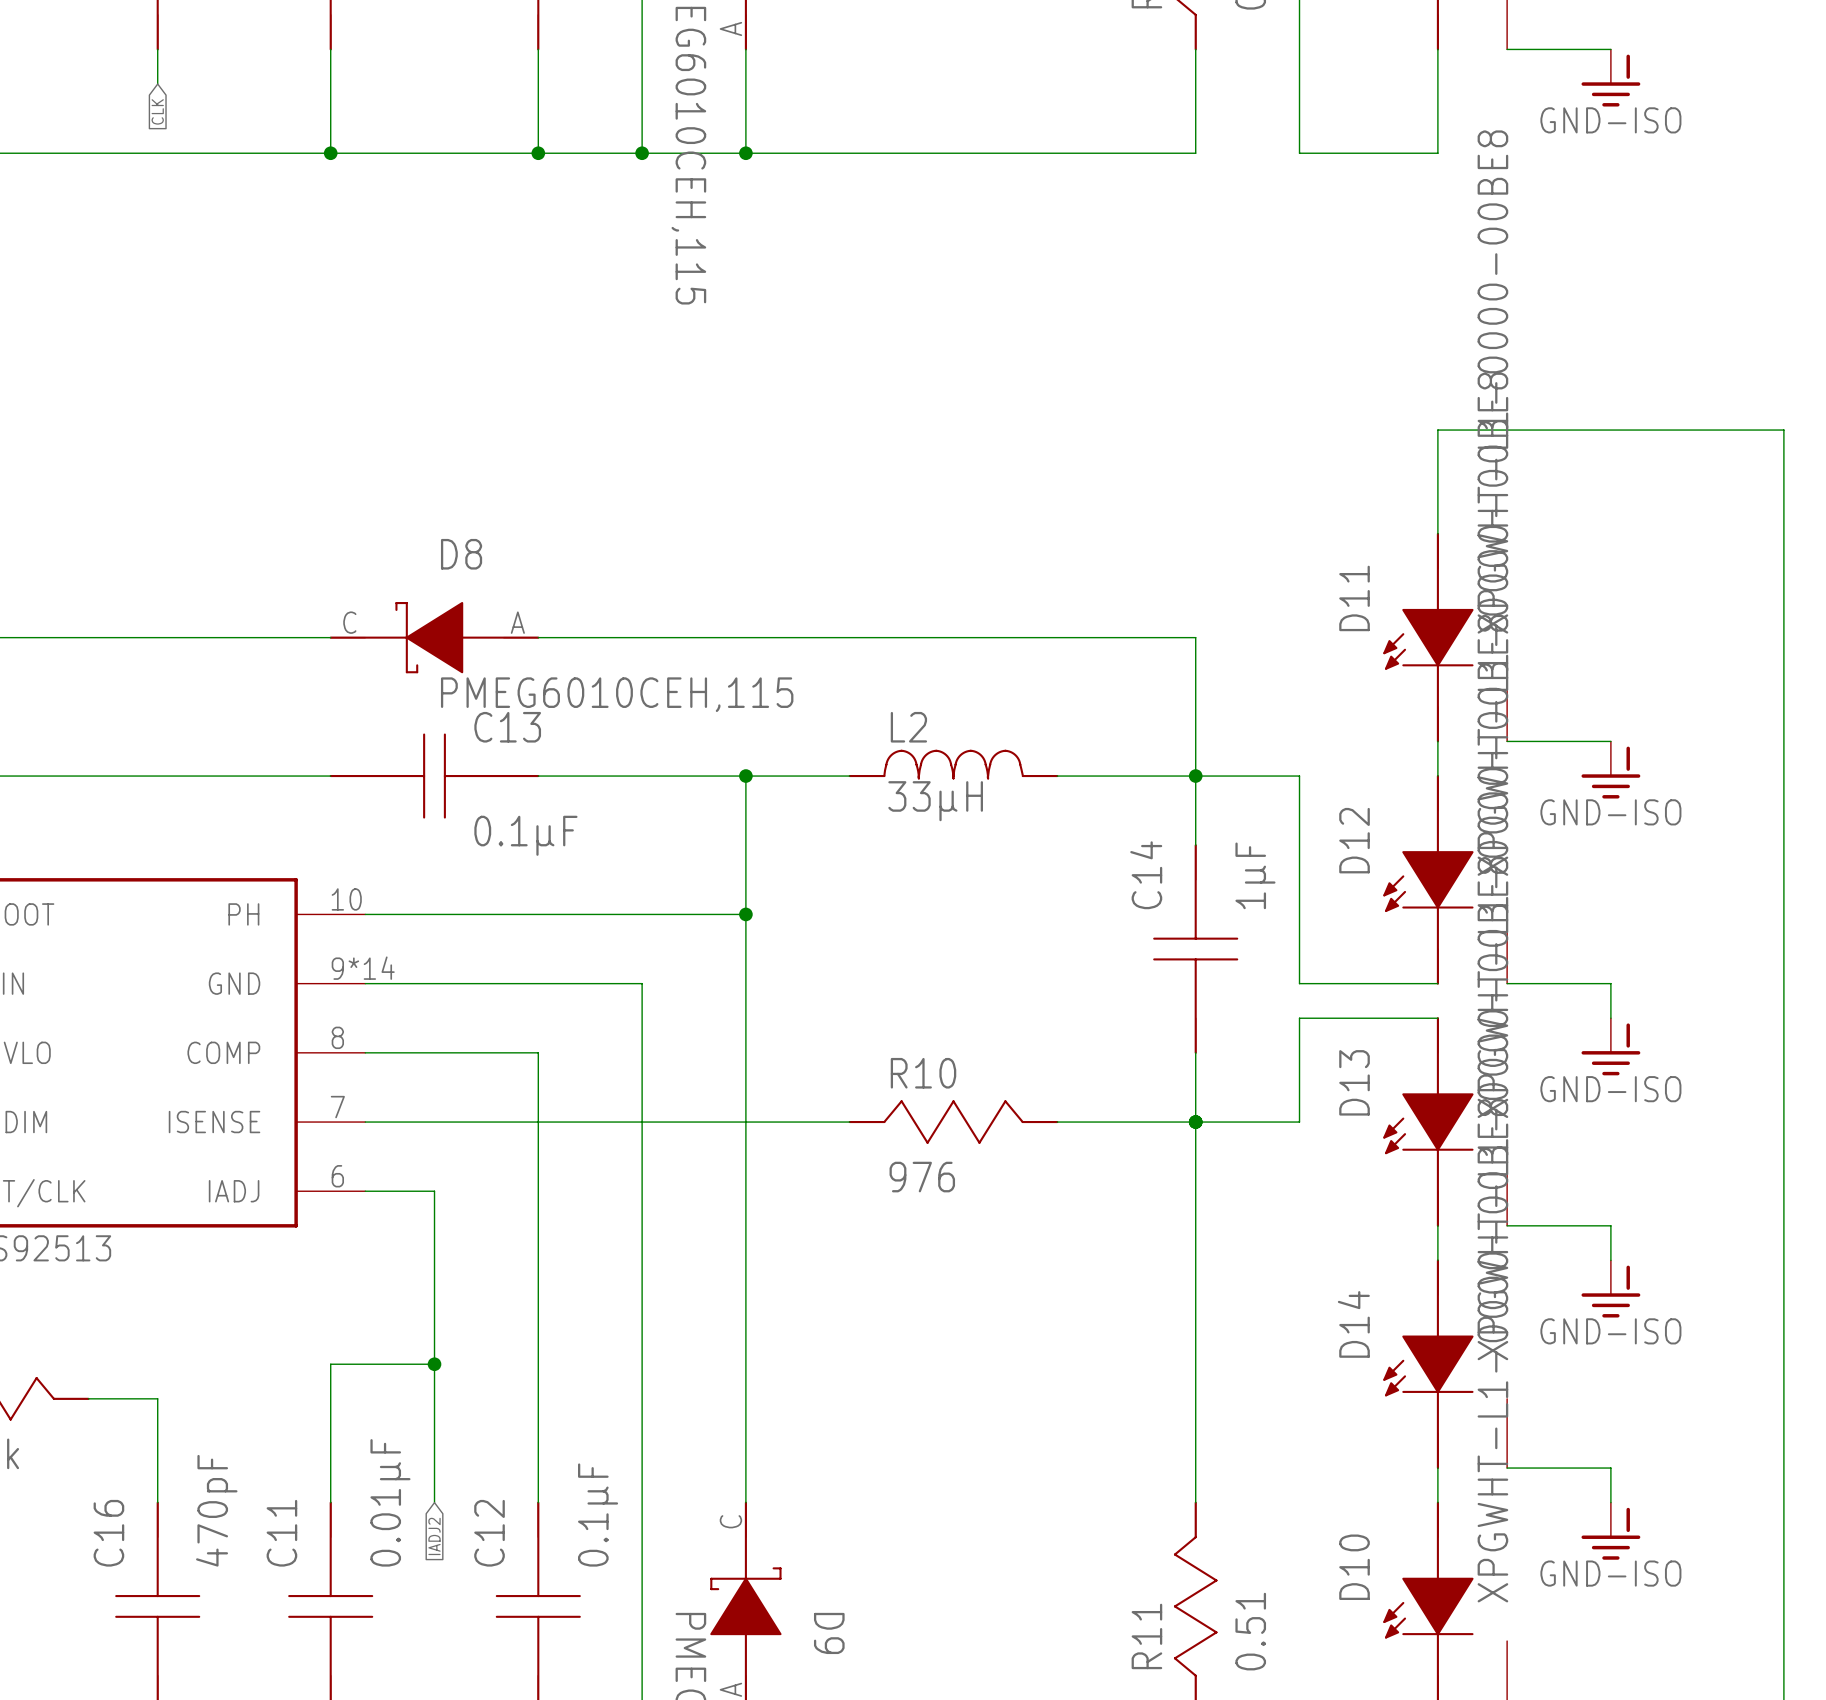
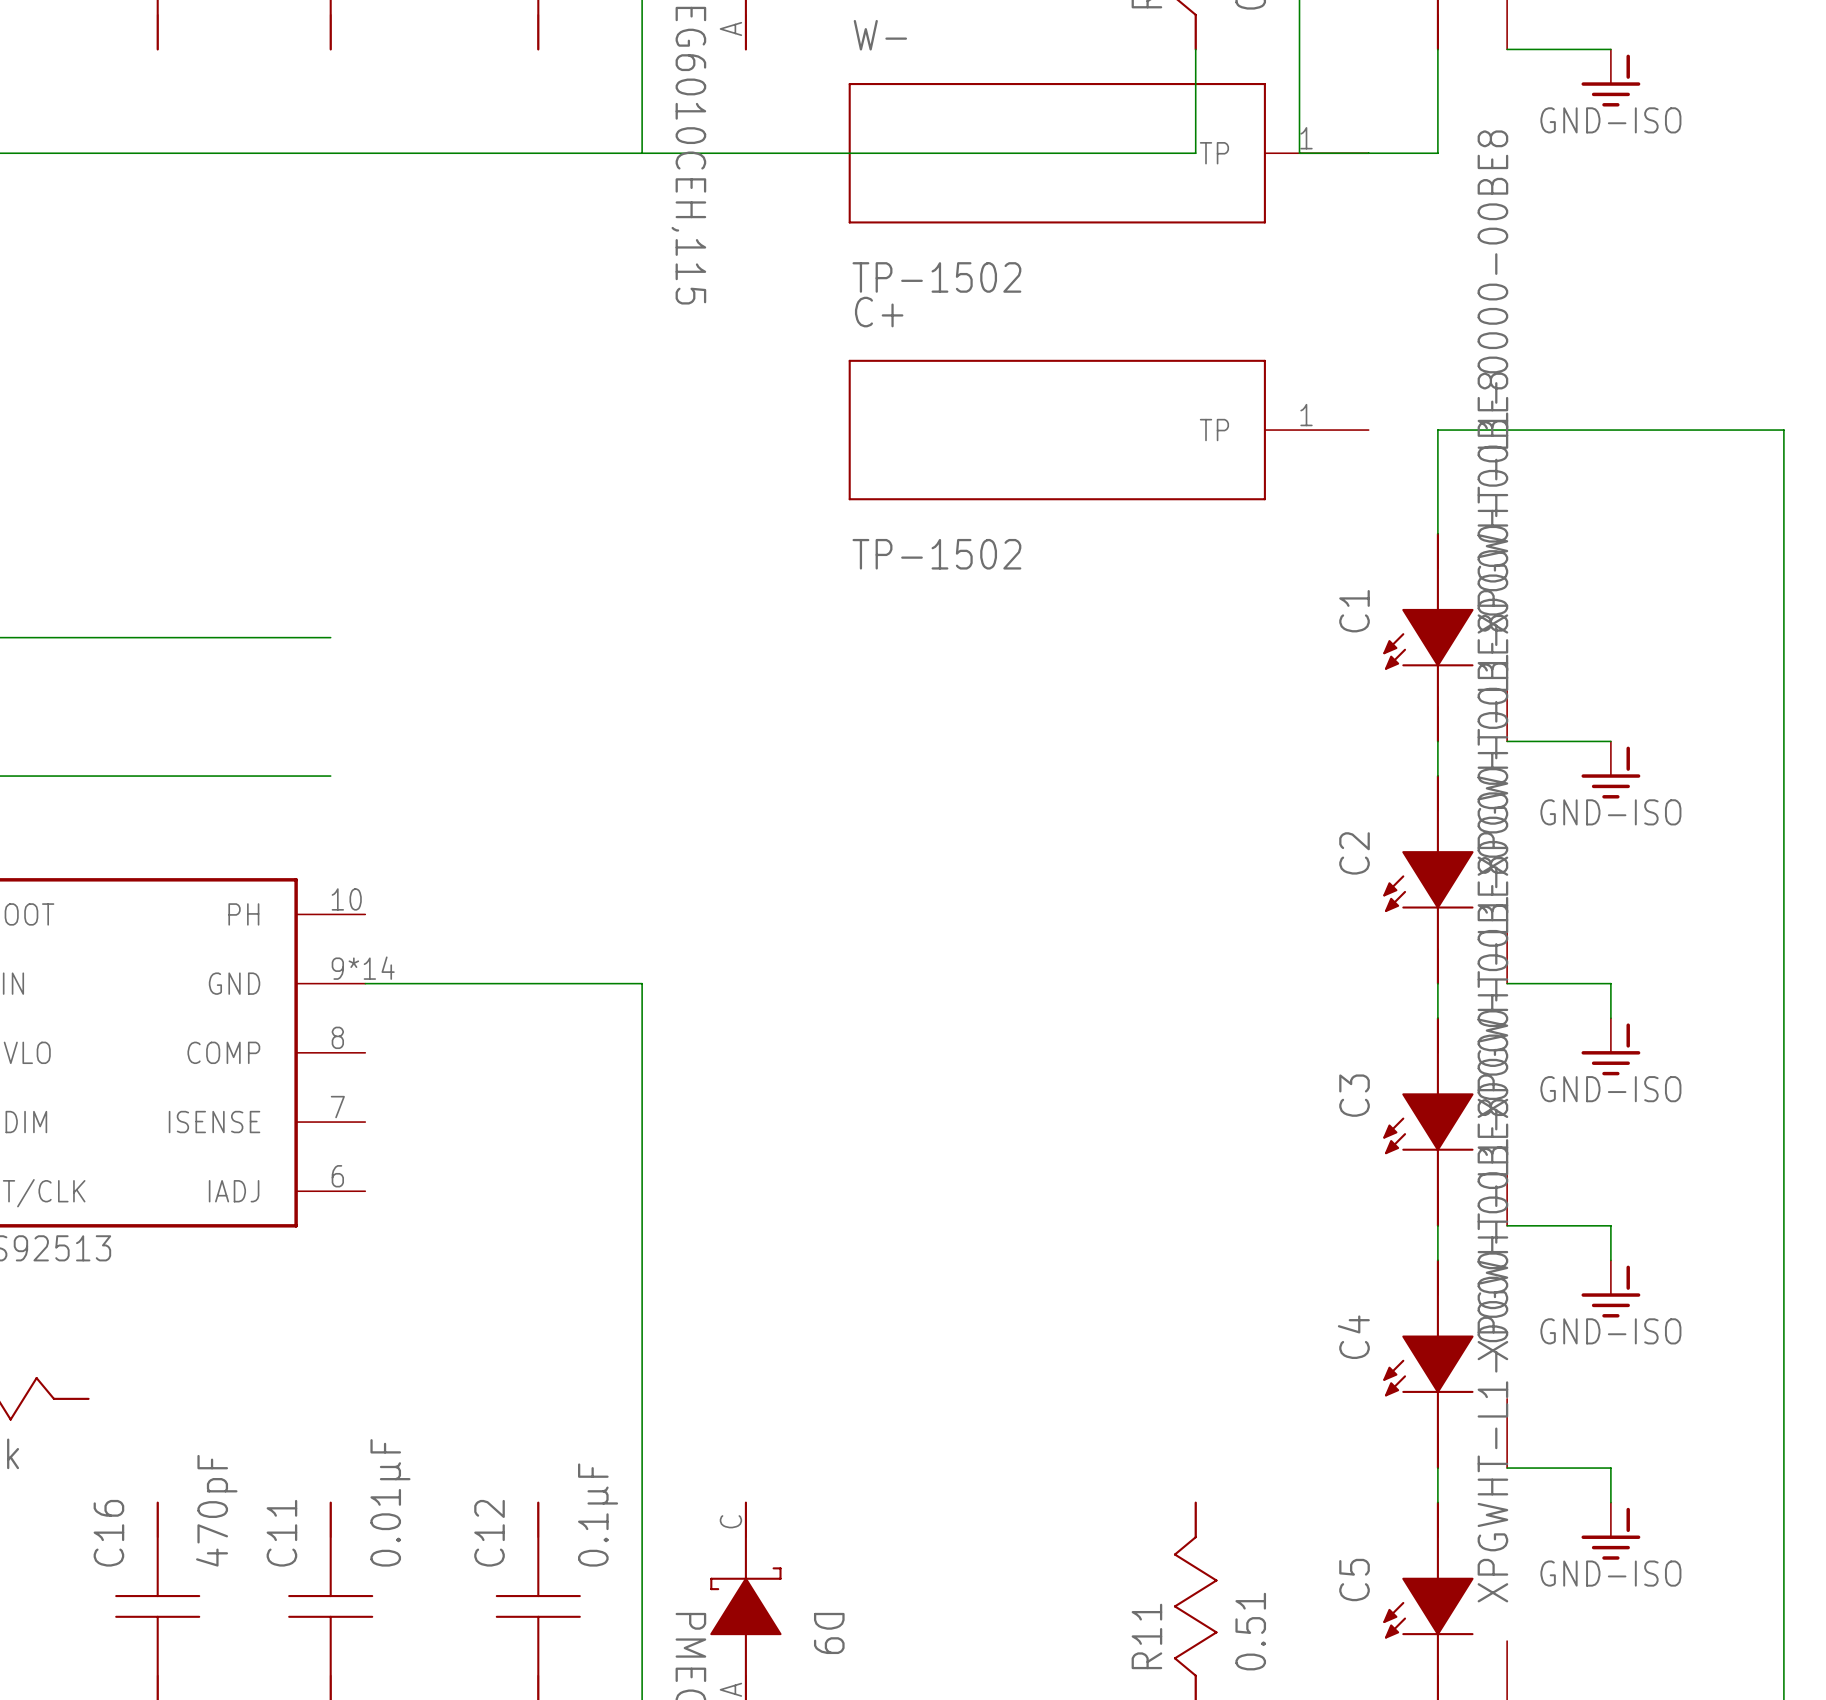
wire: (157, 49) (157, 84) -> none
wire: (330, 49) (330, 153) -> none
wire: (538, 49) (538, 153) -> none
wire: (745, 49) (745, 153) -> none
global label: CLK (157, 111) -> none
junction: (330, 153) -> none
junction: (538, 153) -> none
junction: (642, 153) -> none
junction: (745, 153) -> none
W-: none -> TP-1502 (1108, 153)
C+: none -> TP-1502 (1108, 430)
D11 name: D11 (1354, 598) -> C1 (1354, 611)
D8: PMEG6010CEH,115 (434, 637) -> none
wire: (538, 637) (1195, 637) (1195, 845) -> none
L2: 33µH (953, 764) -> none
C13: 0.1µF (434, 776) -> none
wire: (538, 776) (849, 776) -> none
wire: (745, 776) (745, 1502) -> none
junction: (745, 776) -> none
wire: (1057, 776) (1299, 776) (1299, 983) (1437, 983) -> none
junction: (1195, 776) -> none
D12 name: D12 (1354, 840) -> C2 (1354, 853)
wire: (365, 914) (745, 914) -> none
junction: (745, 914) -> none
C14: 1µF (1195, 949) -> none
wire: (1437, 1018) (1299, 1018) (1299, 1122) (1057, 1122) -> (1437, 1018) (1437, 983)
wire: (365, 1052) (538, 1052) (538, 1502) -> none
wire: (1195, 1052) (1195, 1502) -> none
D13 name: D13 (1354, 1082) -> C3 (1354, 1095)
wire: (365, 1122) (849, 1122) -> none
R10: 976 (953, 1122) -> none
junction: (1195, 1122) -> none
wire: (365, 1191) (434, 1191) (434, 1502) -> none
D14 name: D14 (1353, 1324) -> C4 (1353, 1337)
wire: (434, 1364) (330, 1364) (330, 1502) -> none
junction: (434, 1364) -> none
wire: (88, 1398) (157, 1398) (157, 1502) -> none
global label: IADJ2 (434, 1536) -> none
D10 name: D10 (1354, 1567) -> C5 (1354, 1580)

